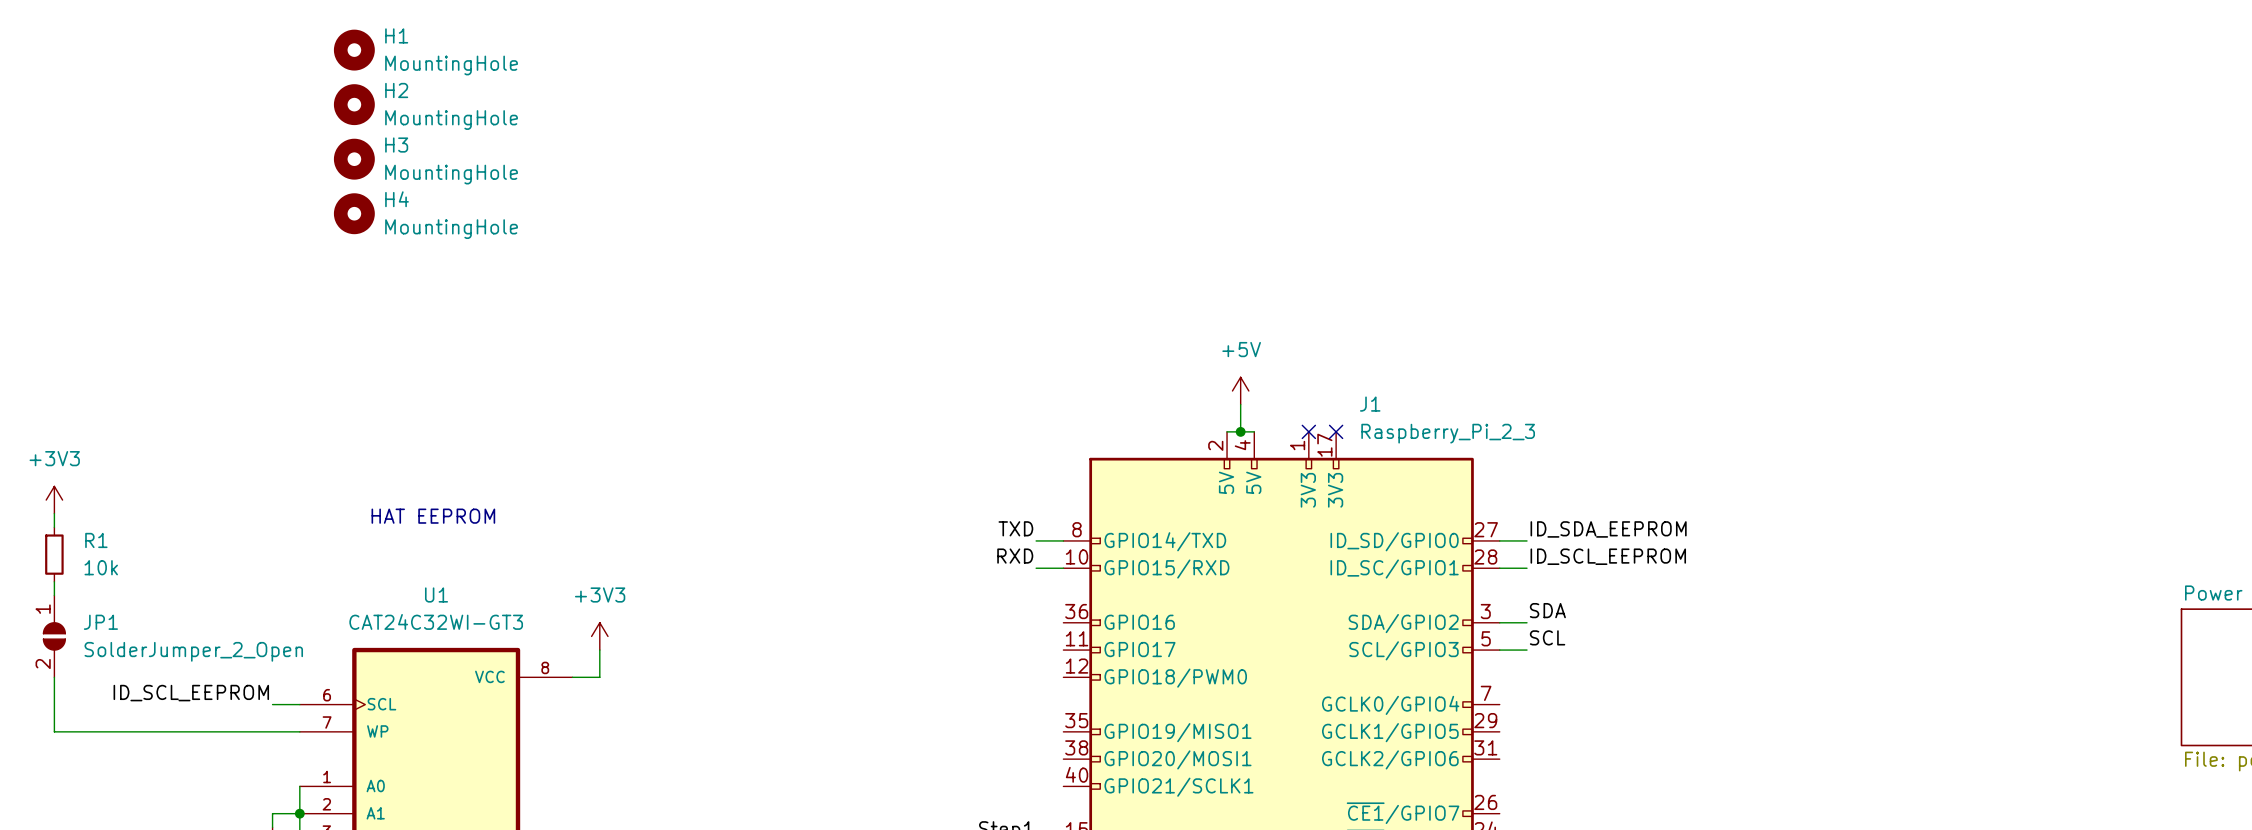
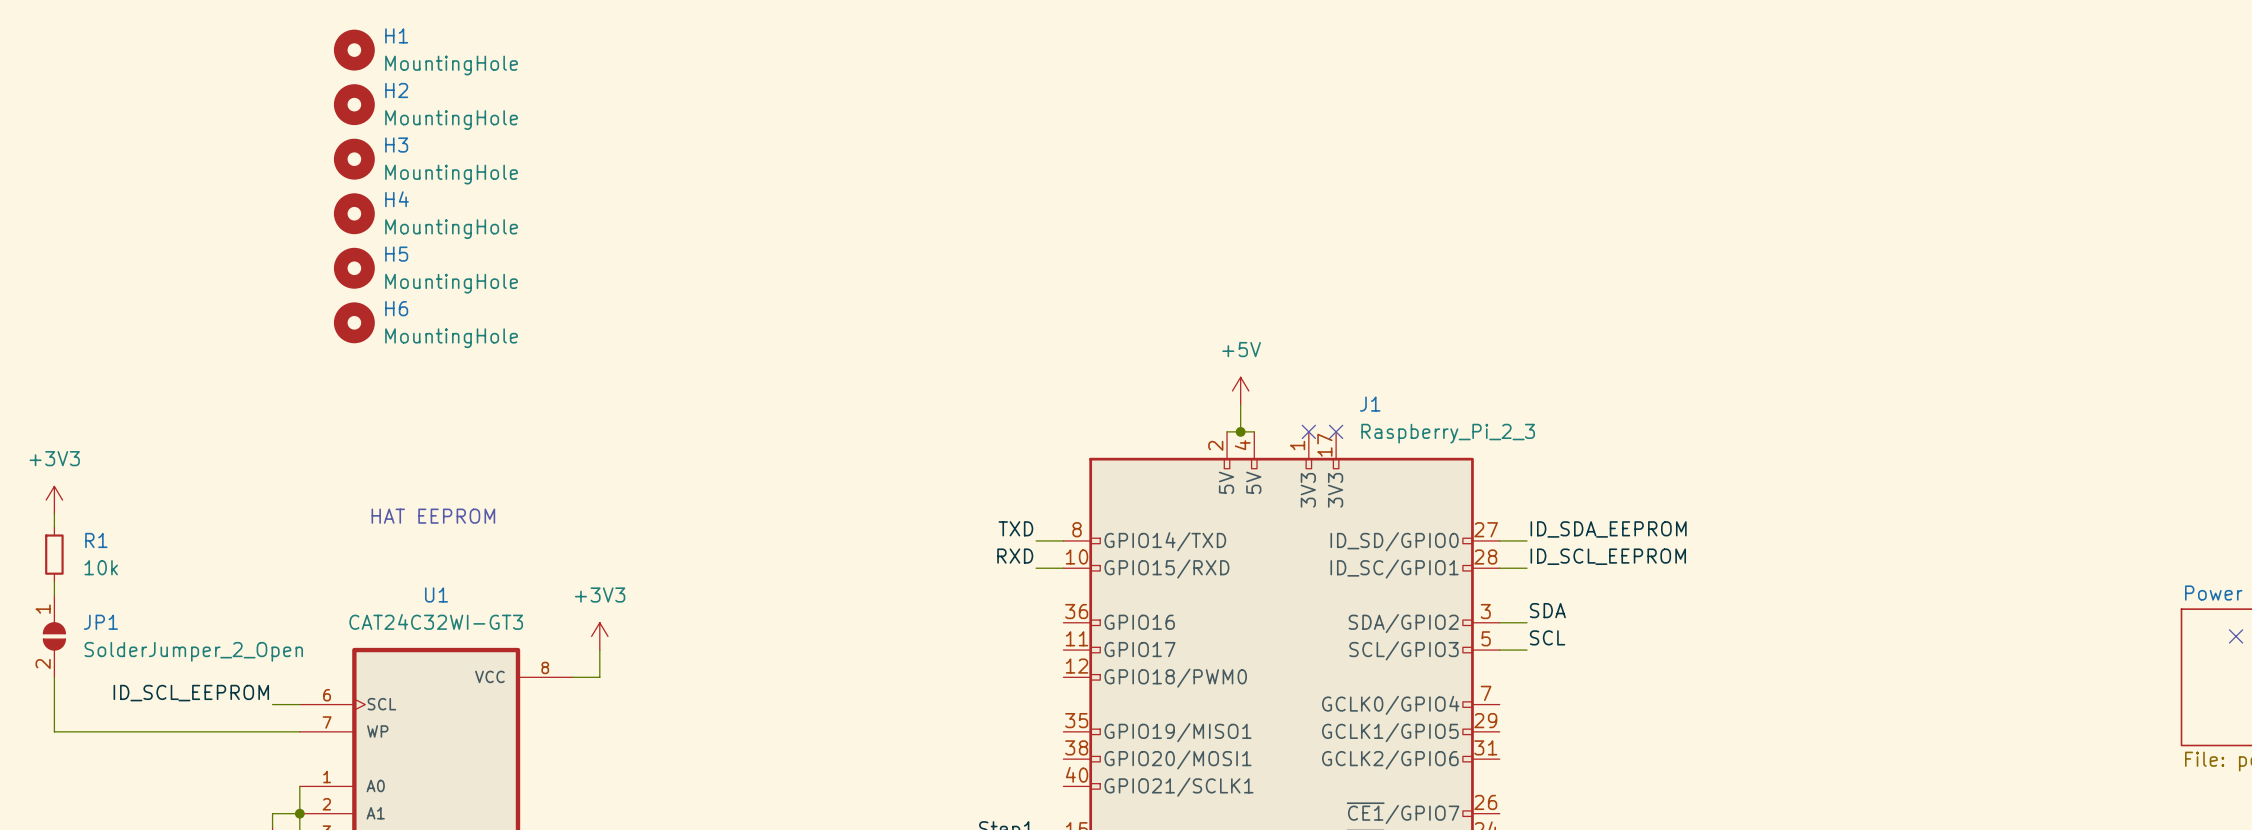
H5: none -> MountingHole (354, 268)
H6: none -> MountingHole (354, 322)
no-connect mark: none -> (2236, 636)

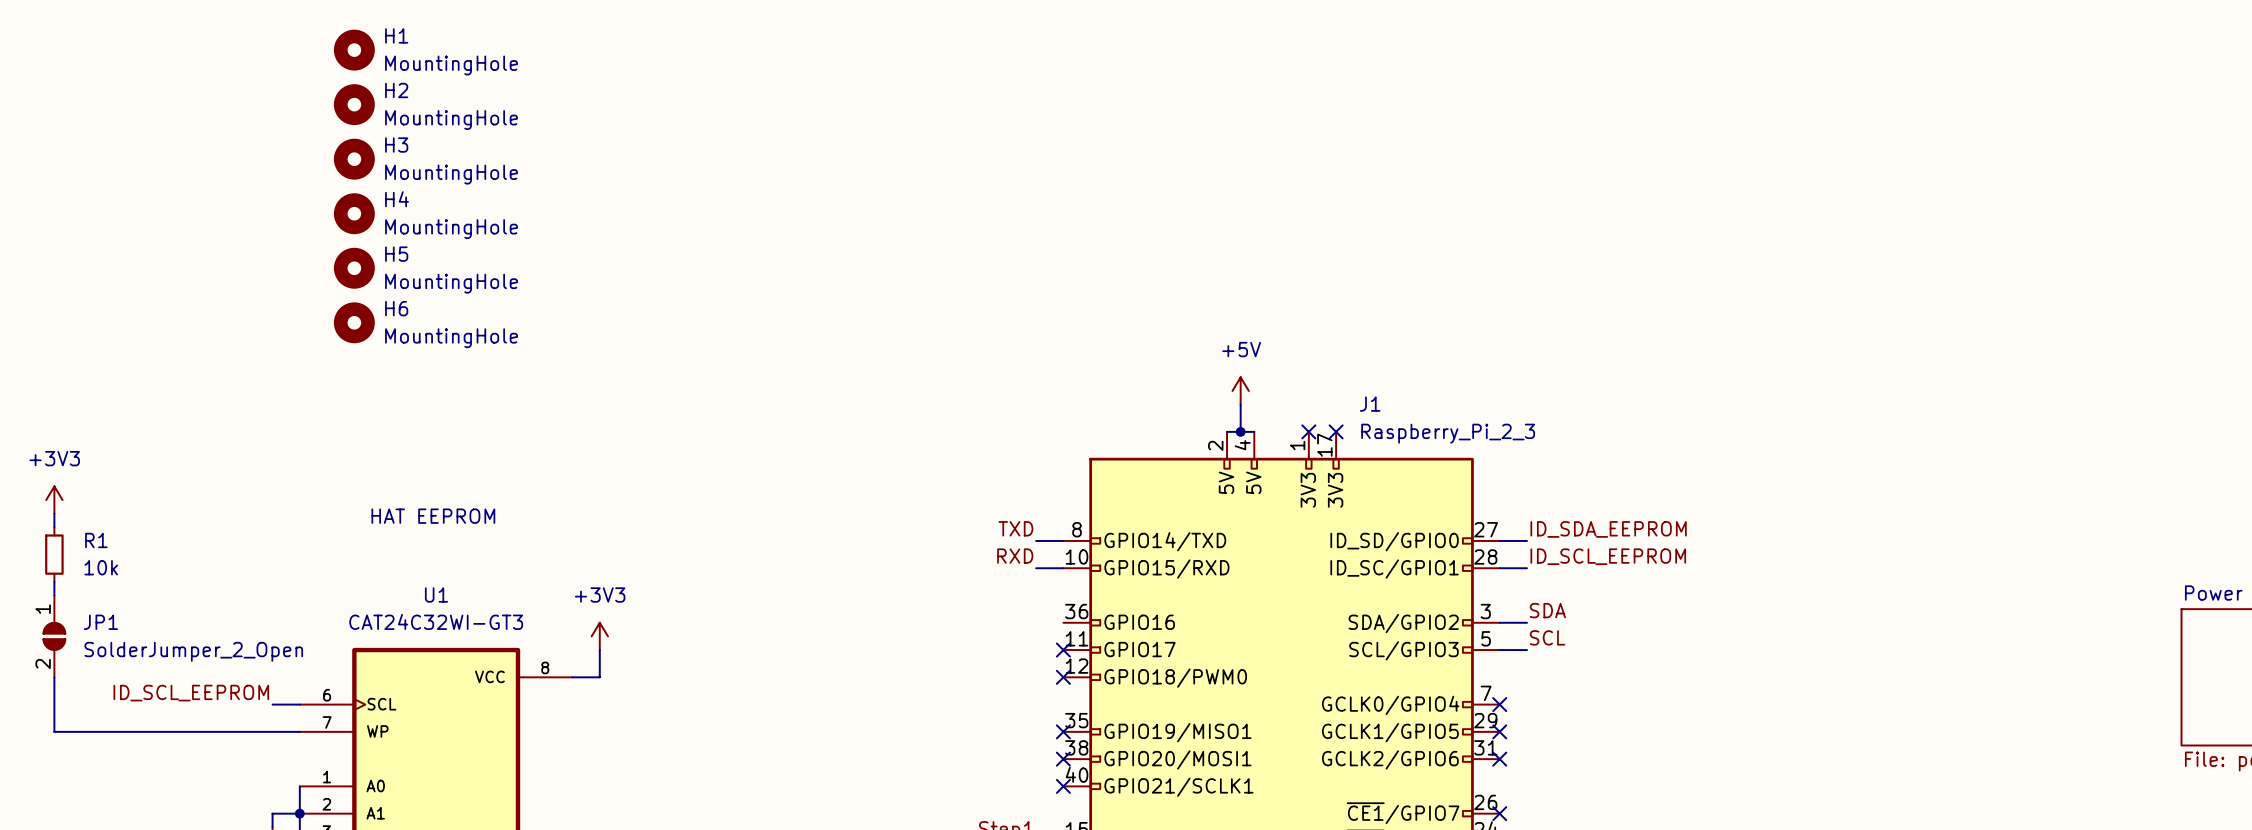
no-connect mark: (2236, 636) -> none
no-connect mark: none -> (1063, 650)
no-connect mark: none -> (1063, 677)
no-connect mark: none -> (1499, 704)
no-connect mark: none -> (1063, 731)
no-connect mark: none -> (1499, 731)
no-connect mark: none -> (1063, 759)
no-connect mark: none -> (1499, 759)
no-connect mark: none -> (1063, 786)
no-connect mark: none -> (1499, 813)

